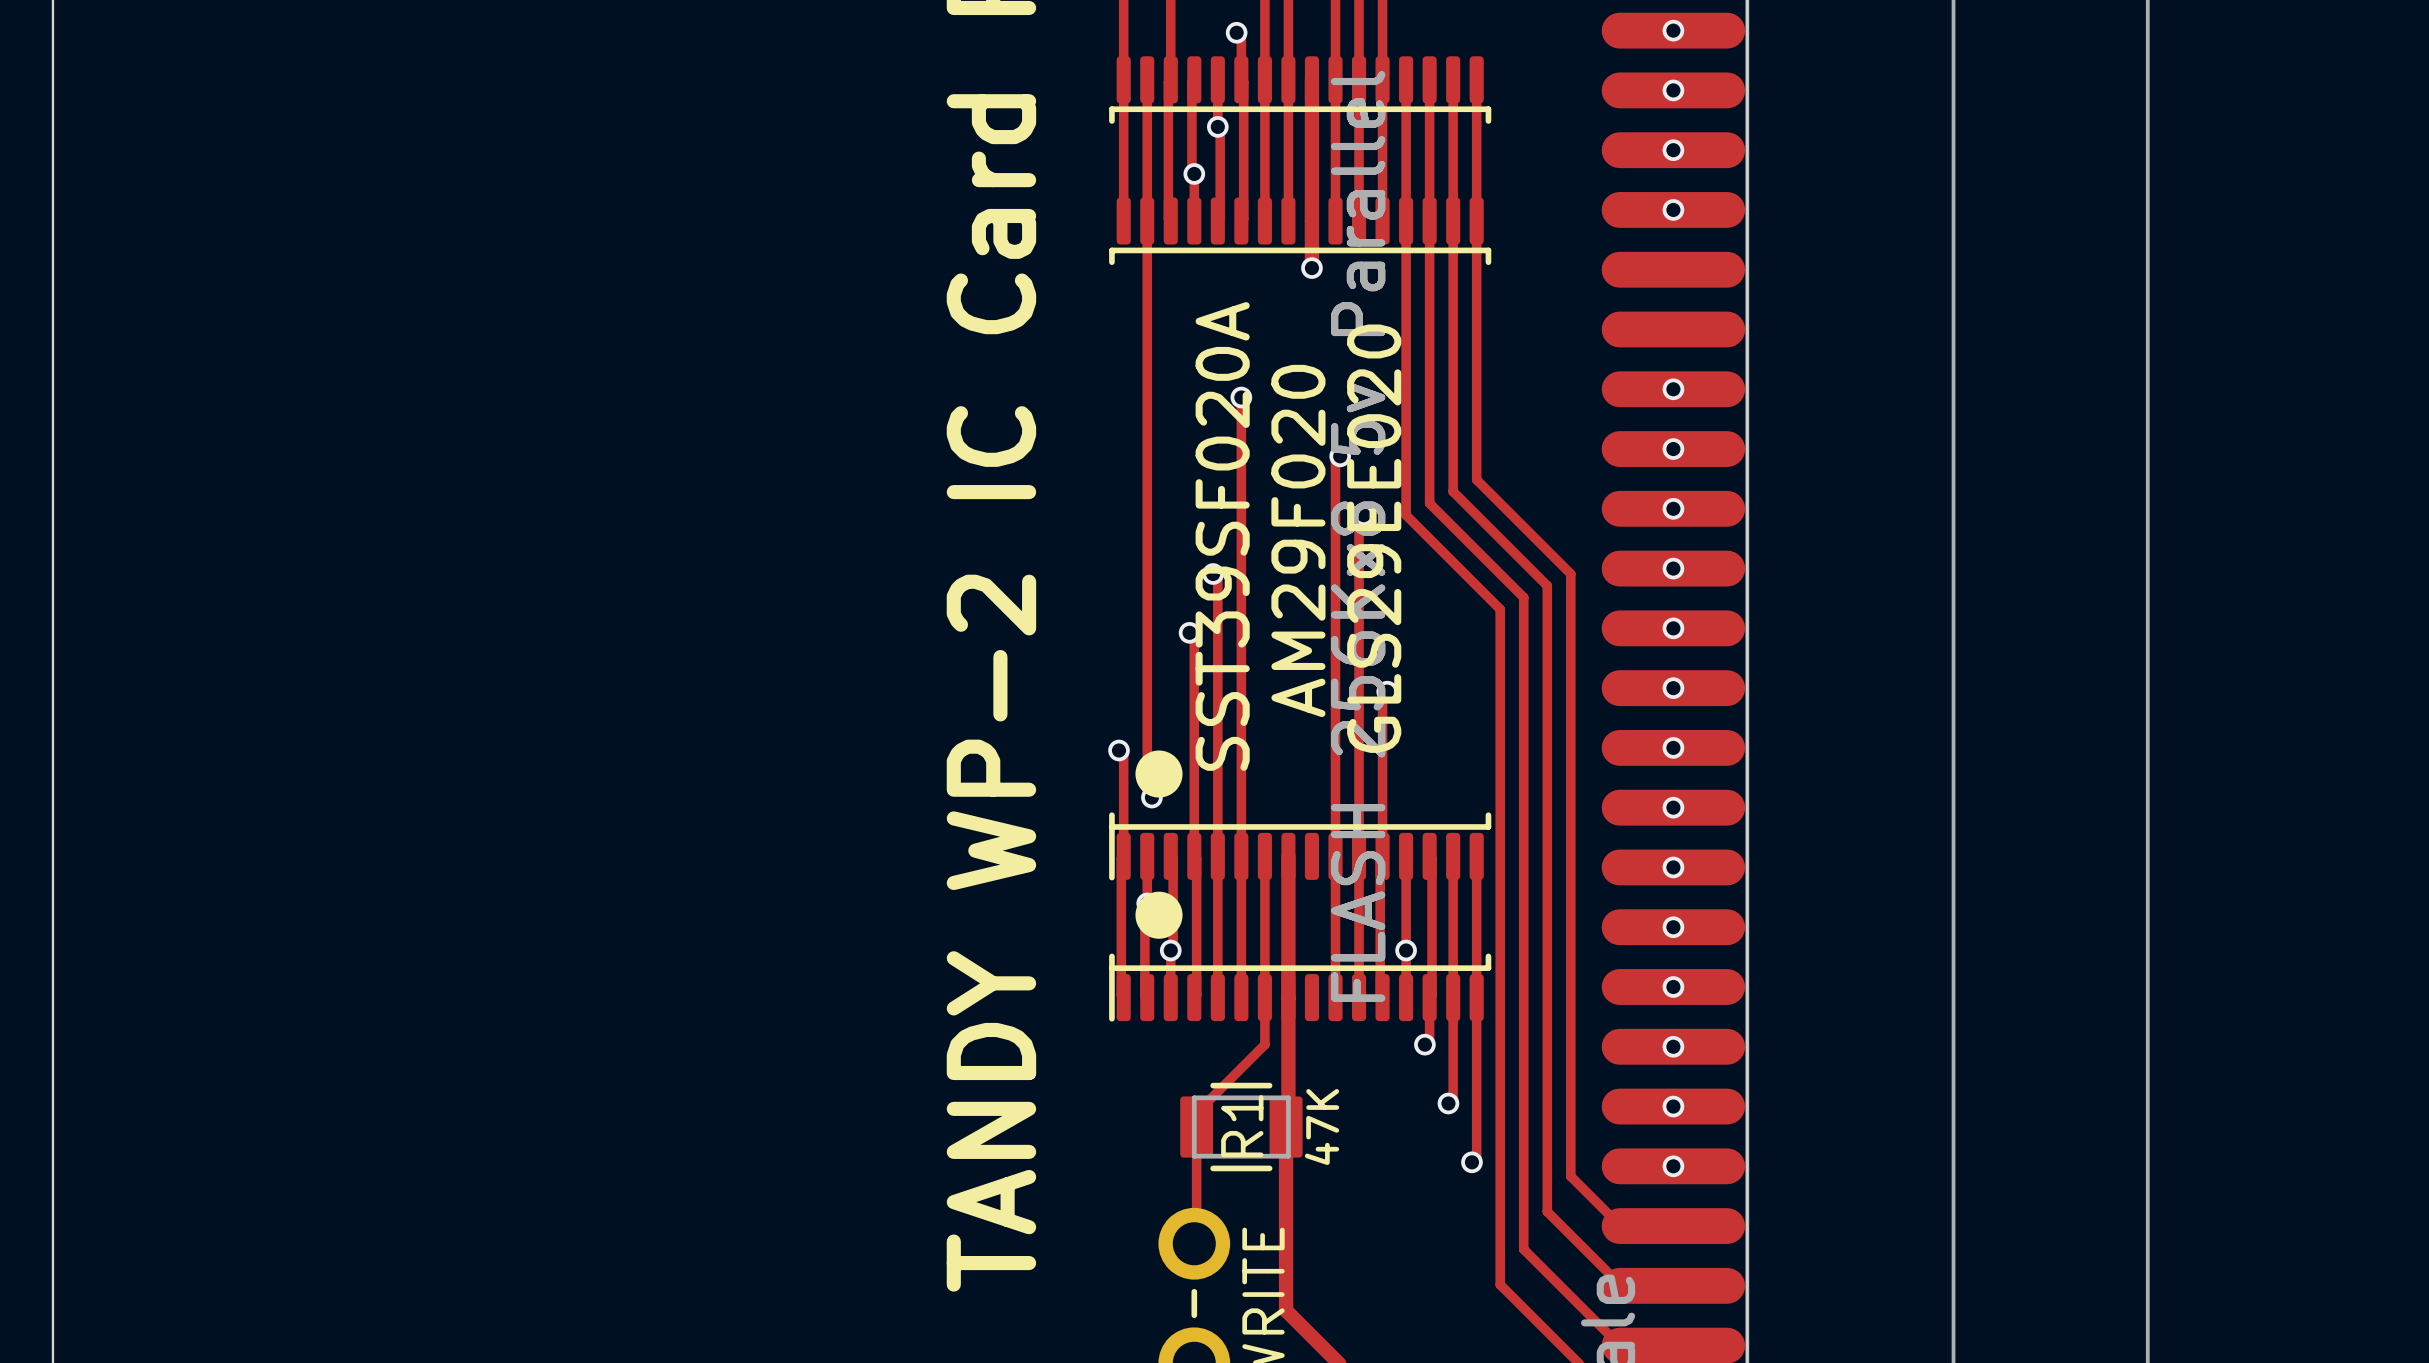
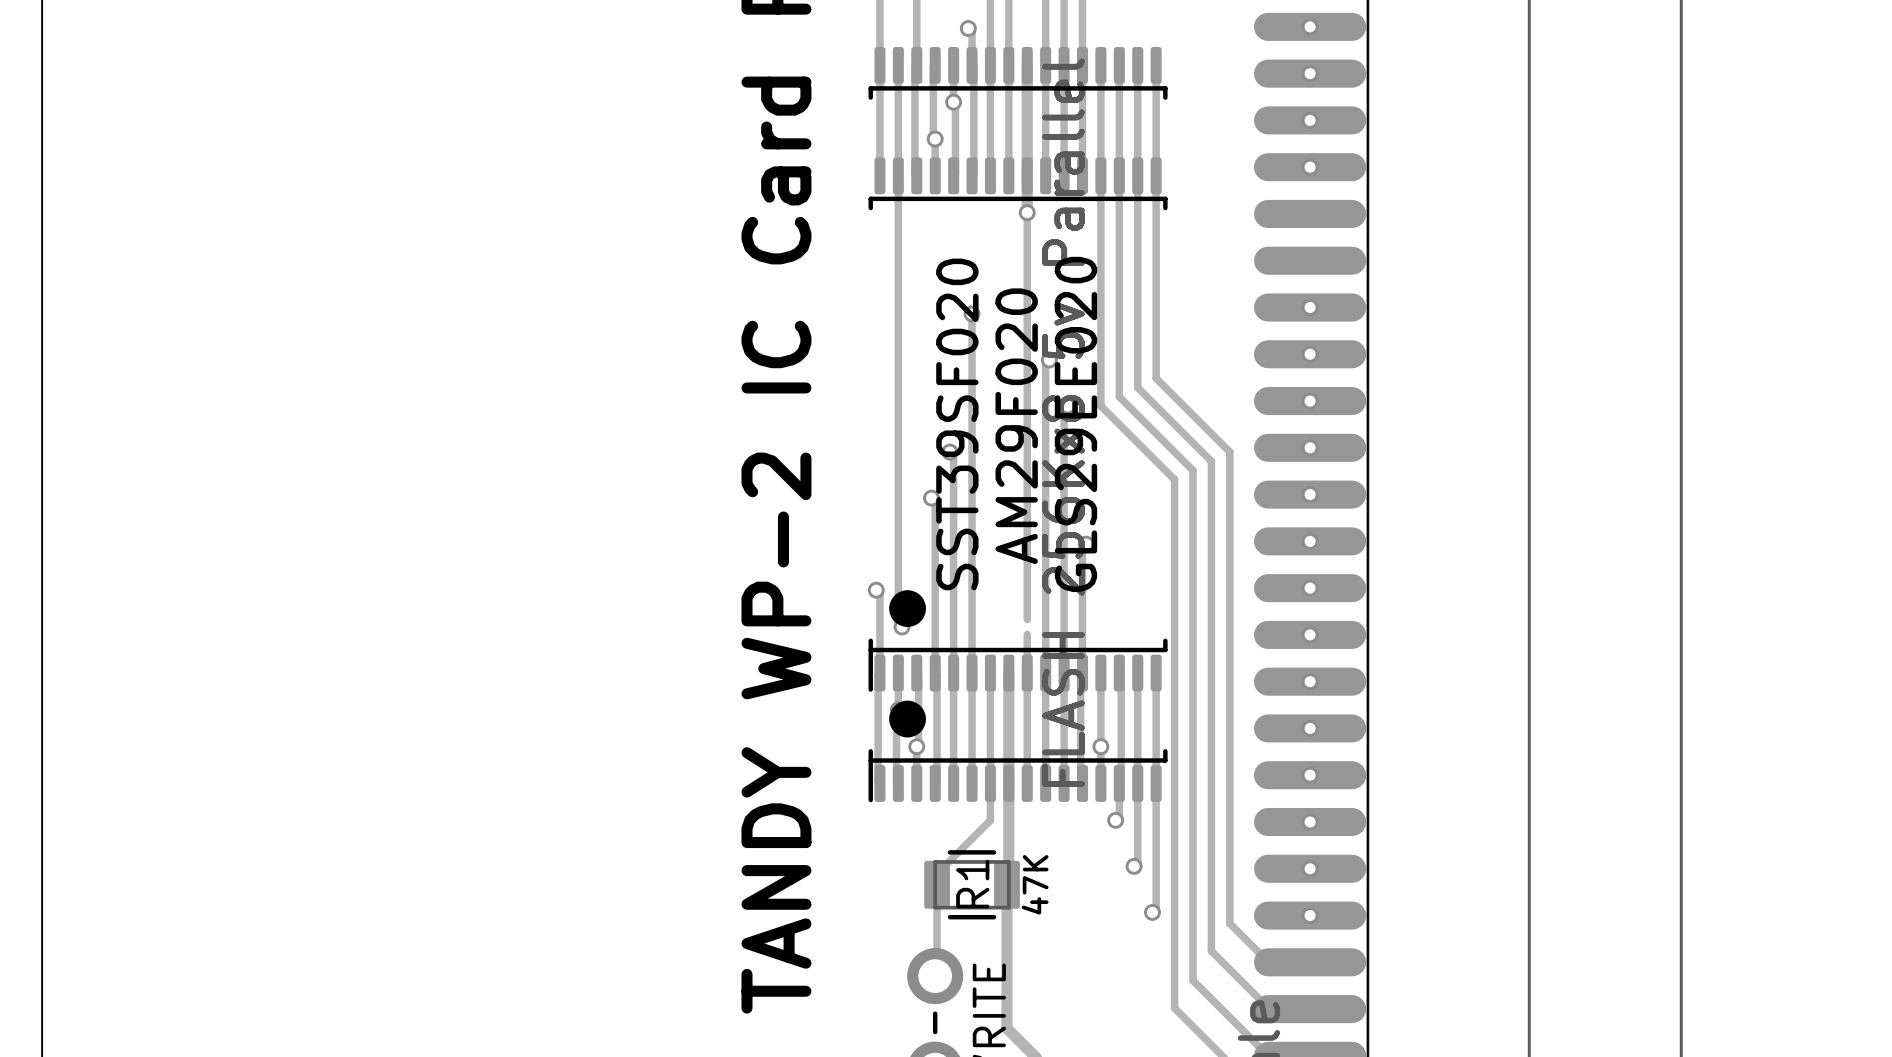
track: none -> (1027, 212) (1027, 619)
text: SST39SF020A (1222, 536) -> SST39SF020 (957, 424)
track: none -> (1027, 634) (1027, 783)

